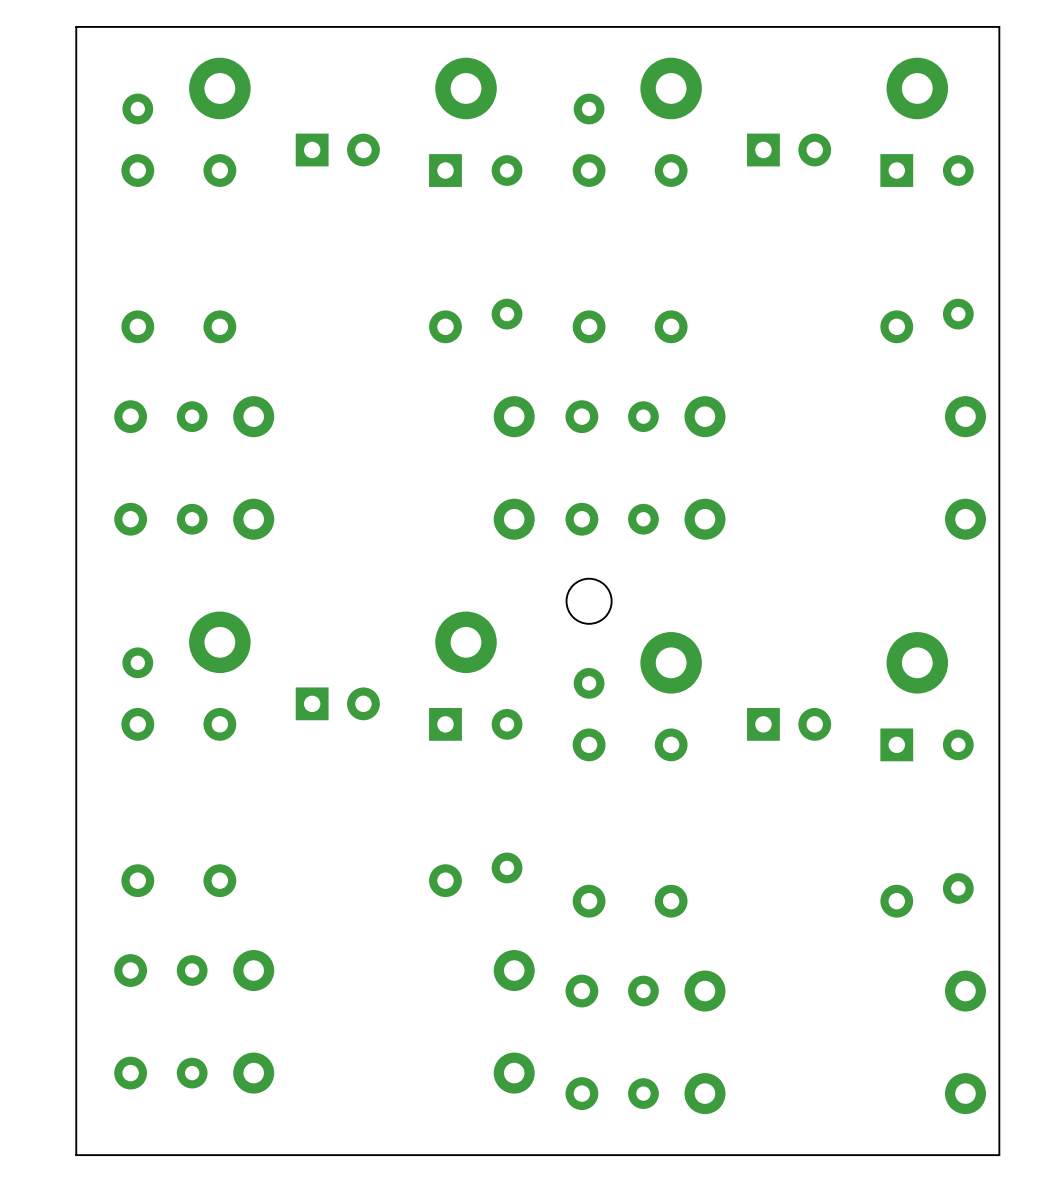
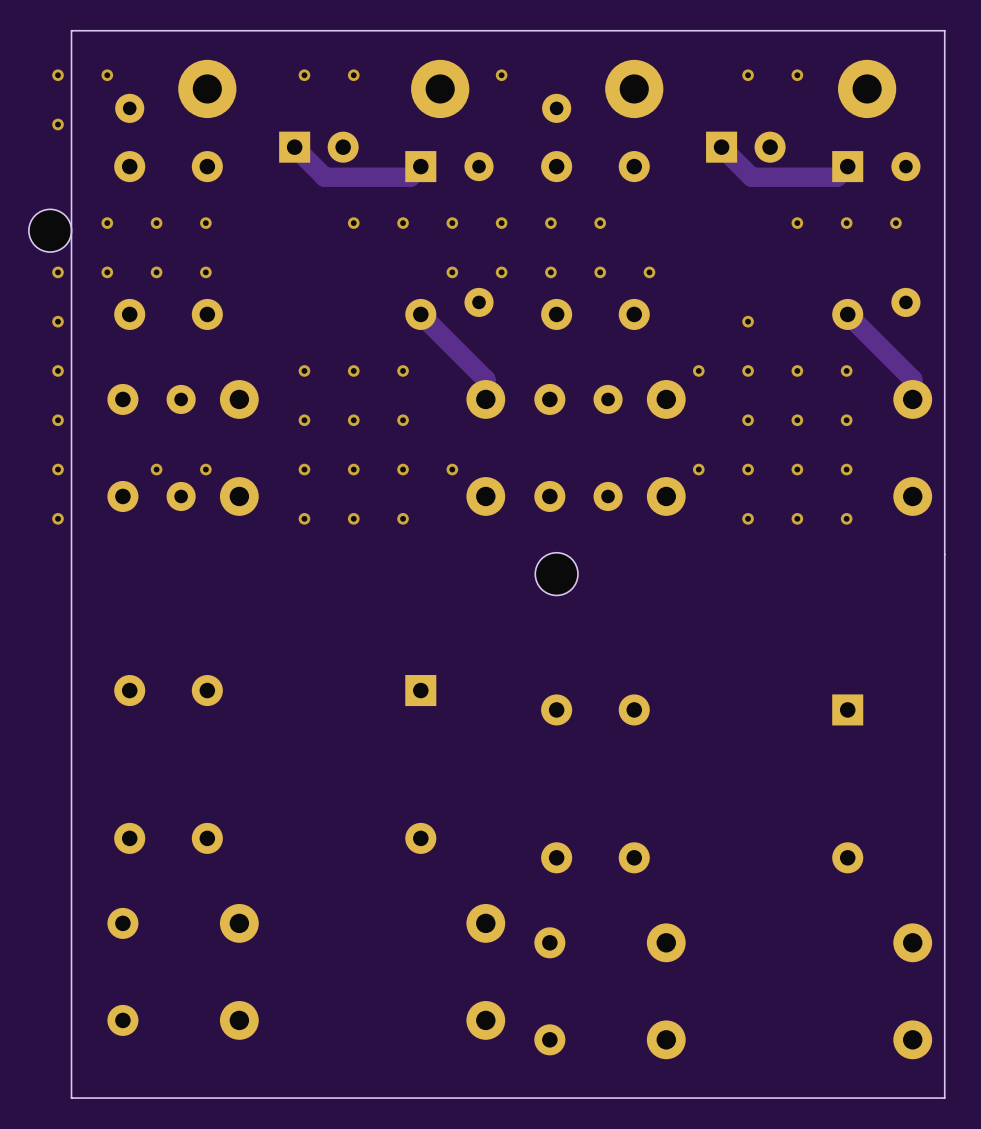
via: none -> (58, 75)
via: none -> (107, 75)
via: none -> (304, 75)
via: none -> (353, 75)
via: none -> (501, 75)
via: none -> (748, 75)
via: none -> (797, 75)
via: none -> (58, 124)
track: none -> (294, 147) (324, 177) (410, 177) (420, 166)
track: none -> (721, 147) (751, 177) (837, 177) (847, 166)
via: none -> (107, 223)
via: none -> (156, 223)
via: none -> (205, 223)
via: none -> (353, 223)
via: none -> (403, 223)
via: none -> (452, 223)
via: none -> (501, 223)
via: none -> (550, 223)
via: none -> (600, 223)
via: none -> (797, 223)
via: none -> (846, 223)
via: none -> (895, 223)
part: none -> (50, 230)
via: none -> (58, 272)
via: none -> (107, 272)
via: none -> (156, 272)
via: none -> (205, 272)
via: none -> (452, 272)
via: none -> (501, 272)
via: none -> (550, 272)
via: none -> (600, 272)
via: none -> (649, 272)
track: none -> (420, 314) (485, 379) (485, 399)
track: none -> (847, 314) (912, 379) (912, 399)
via: none -> (58, 321)
via: none -> (748, 321)
via: none -> (58, 370)
via: none -> (304, 370)
via: none -> (353, 370)
via: none -> (403, 370)
via: none -> (698, 370)
via: none -> (748, 370)
via: none -> (797, 370)
via: none -> (846, 370)
via: none -> (58, 420)
via: none -> (304, 420)
via: none -> (353, 420)
via: none -> (403, 420)
via: none -> (748, 420)
via: none -> (797, 420)
via: none -> (846, 420)
via: none -> (58, 469)
via: none -> (156, 469)
via: none -> (205, 469)
via: none -> (304, 469)
via: none -> (353, 469)
via: none -> (403, 469)
via: none -> (452, 469)
via: none -> (698, 469)
via: none -> (748, 469)
via: none -> (797, 469)
via: none -> (846, 469)
via: none -> (58, 518)
via: none -> (304, 518)
via: none -> (353, 518)
via: none -> (403, 518)
via: none -> (748, 518)
via: none -> (797, 518)
via: none -> (846, 518)
part: (219, 642) -> none
part: (466, 642) -> none
part: (137, 662) -> none
part: (671, 662) -> none
part: (917, 662) -> none
part: (589, 683) -> none
part: (337, 703) -> none
part: (507, 724) -> none
part: (789, 724) -> none
part: (958, 744) -> none
part: (507, 867) -> none
part: (958, 888) -> none
part: (192, 970) -> none
part: (643, 991) -> none
part: (192, 1073) -> none
part: (643, 1093) -> none

